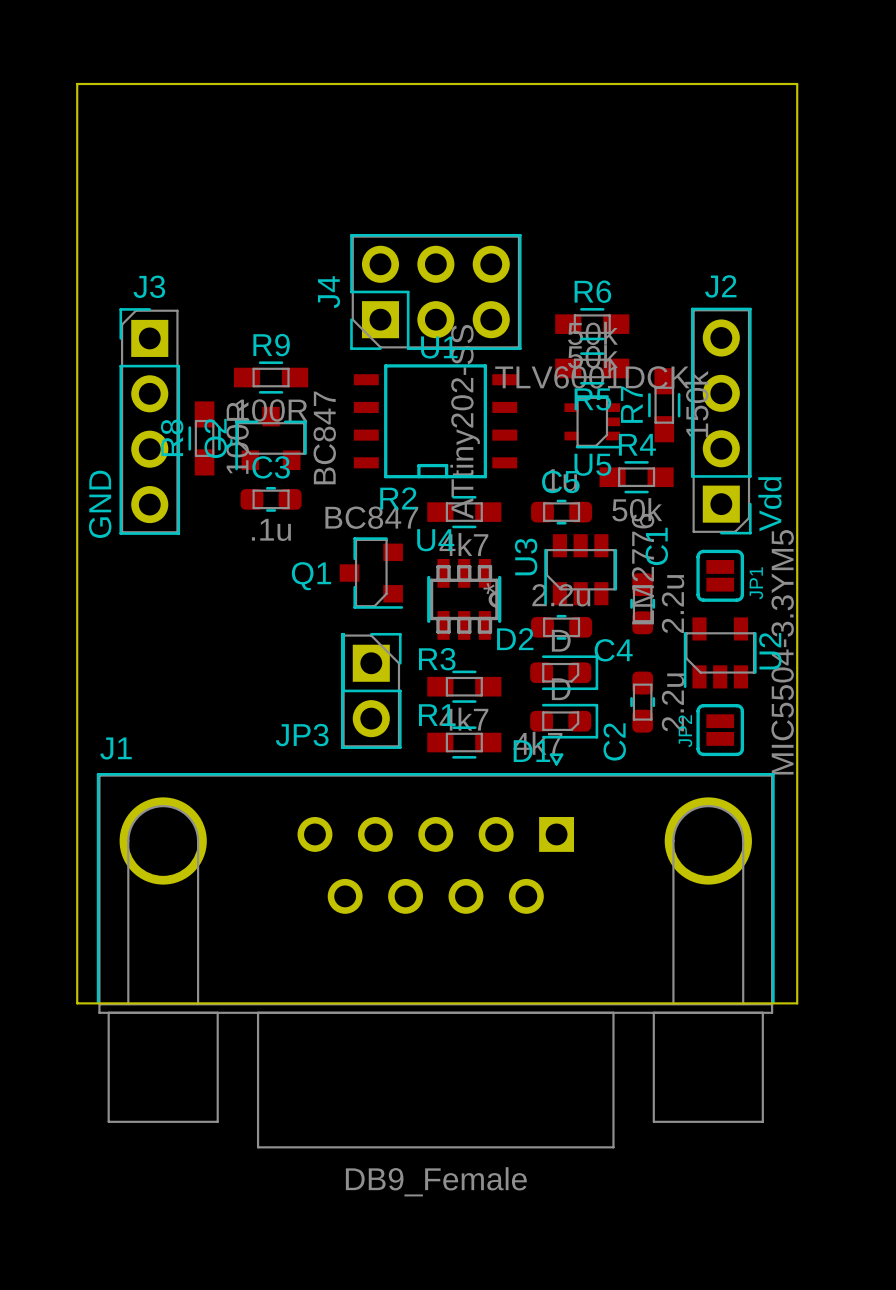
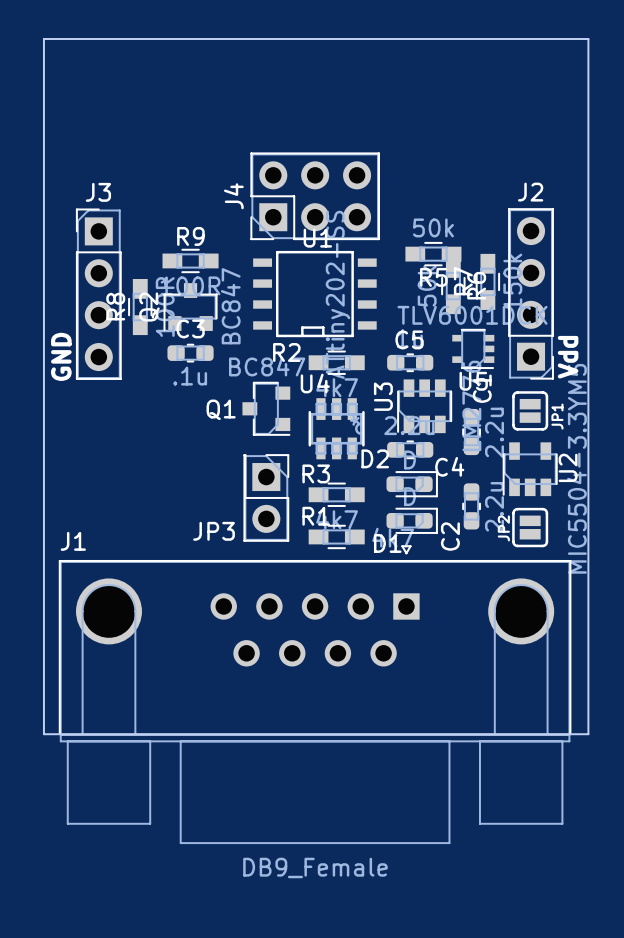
R6 rotation: 0° (592, 324) -> 90° clockwise (453, 286)
R6 position: (592, 324) -> (453, 286)
U5 position: (592, 421) -> (473, 348)
R4: 50k (636, 477) -> none

